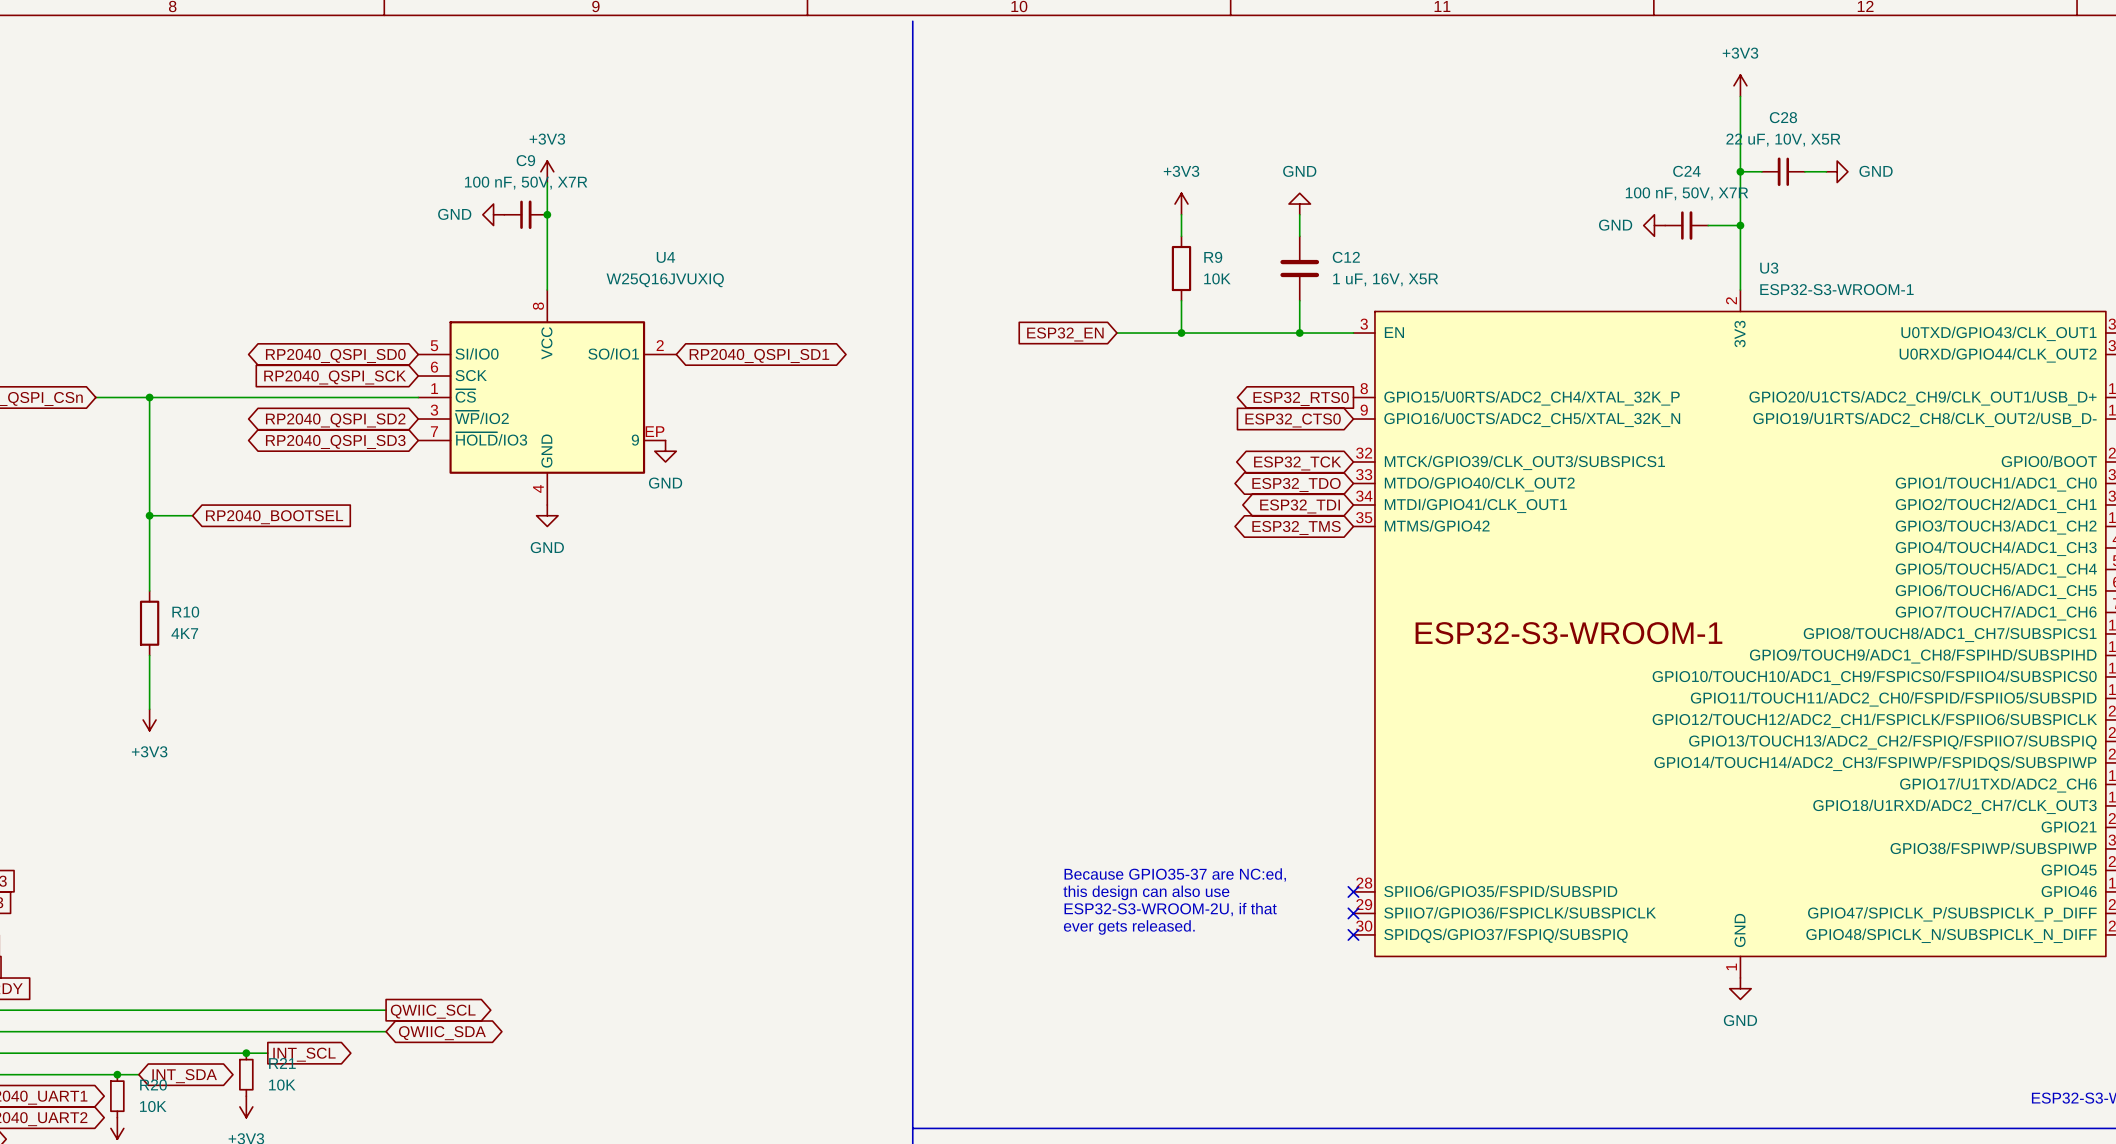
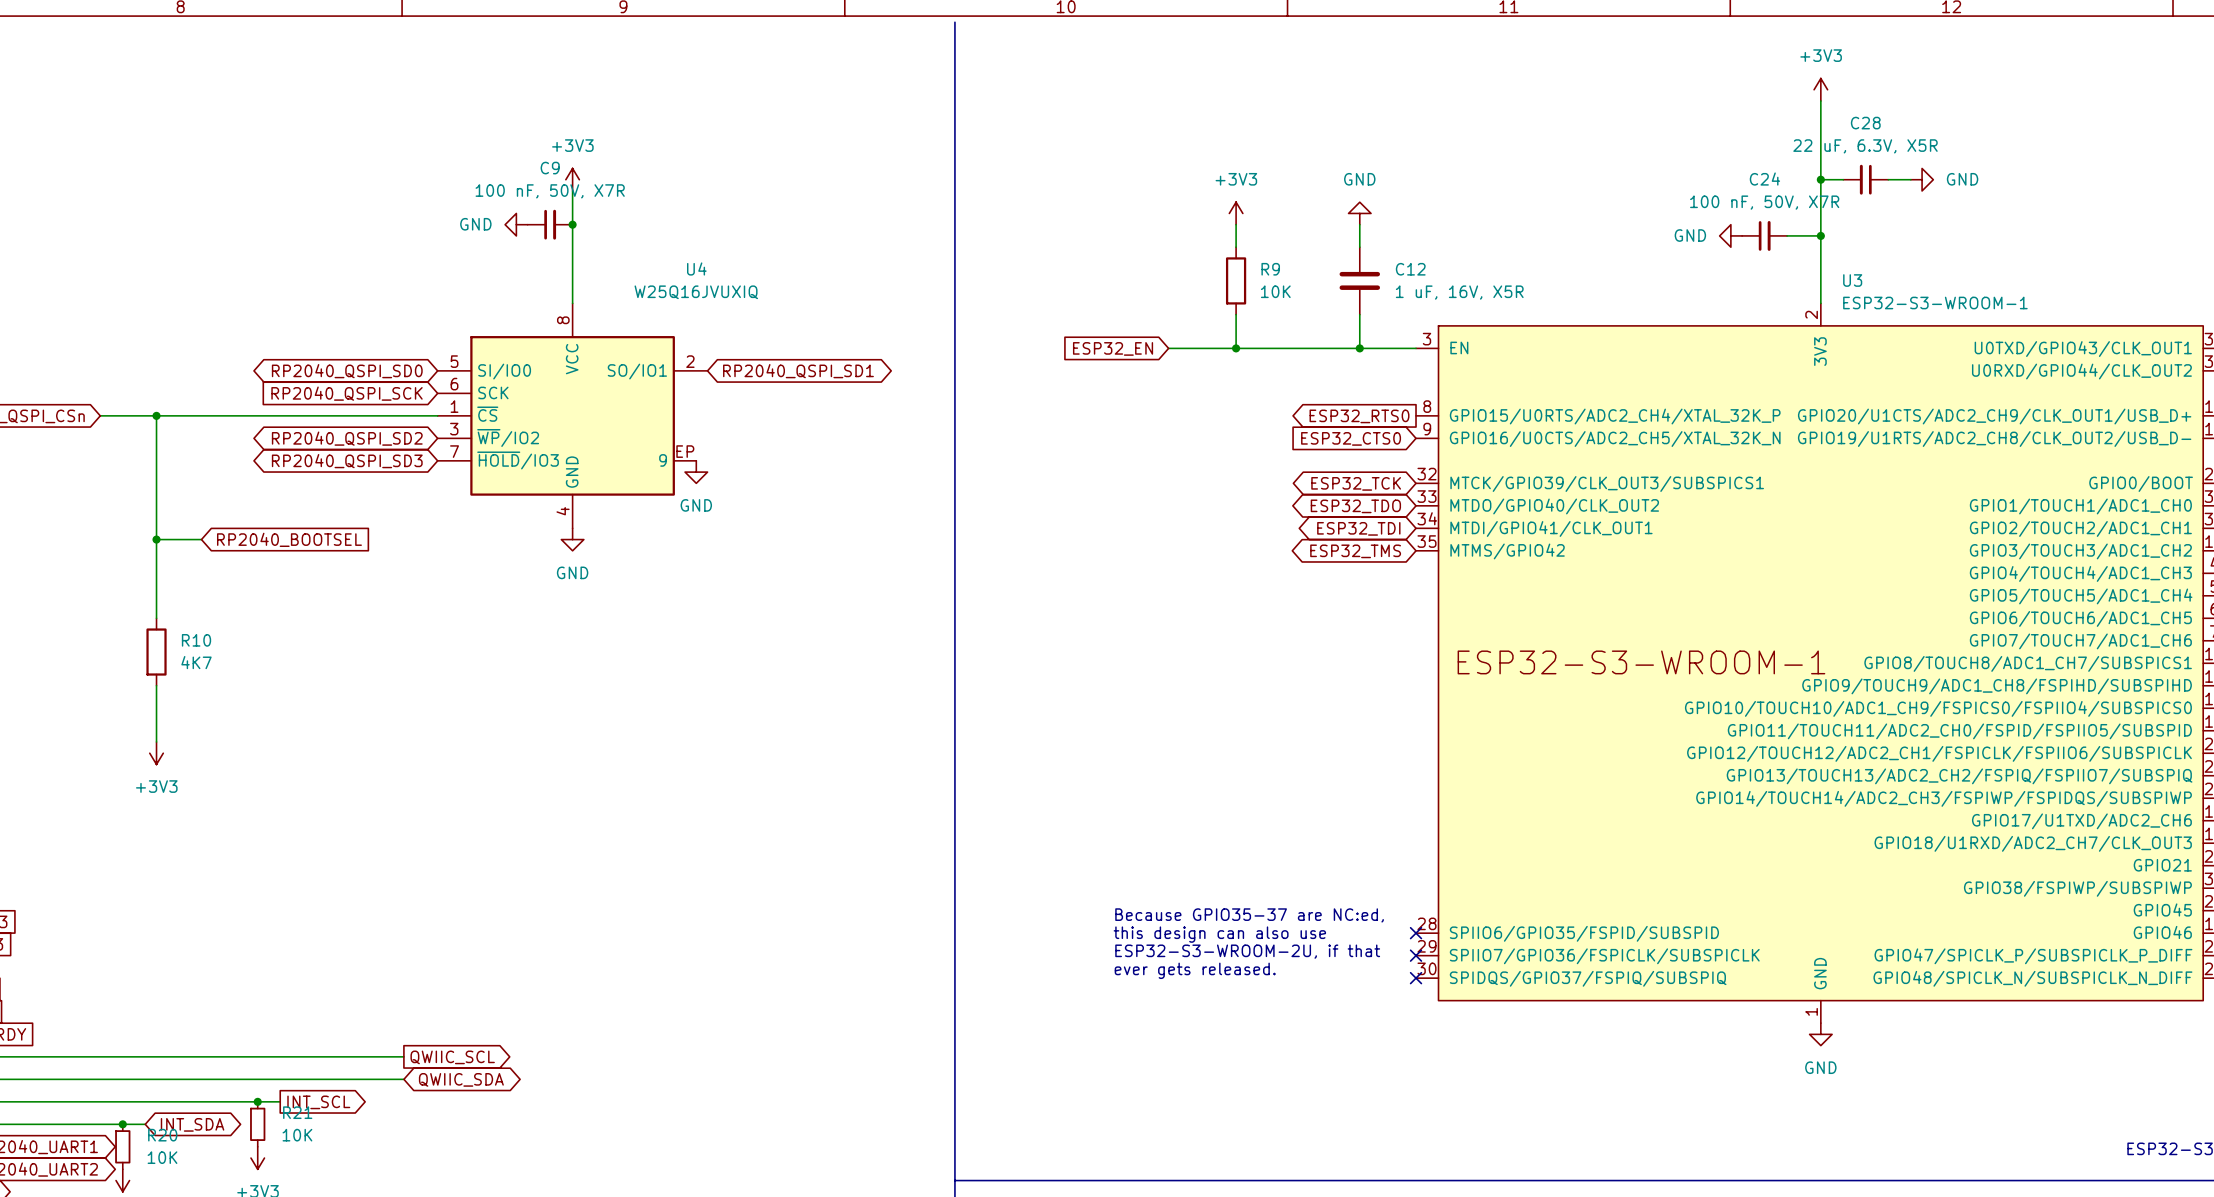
C28 value: 22 uF, 10V, X5R (1783, 140) -> 22 uF, 6.3V, X5R (1865, 146)

